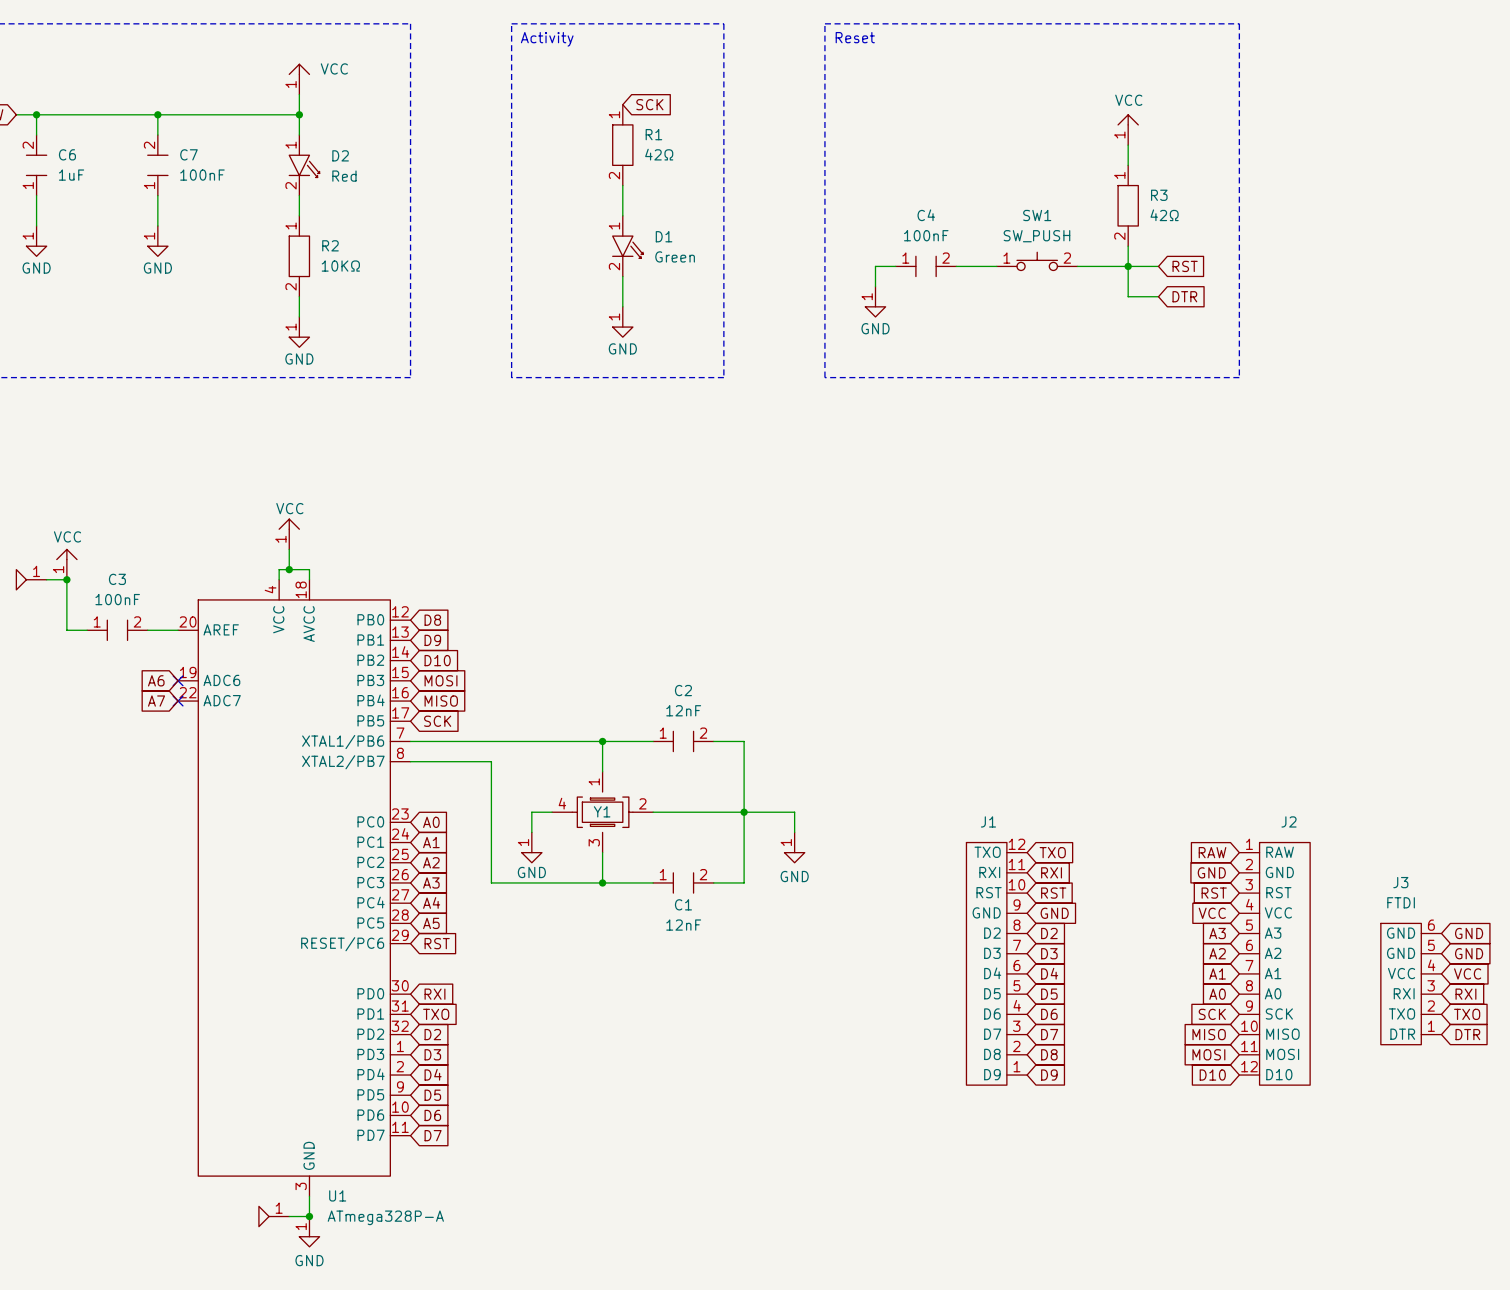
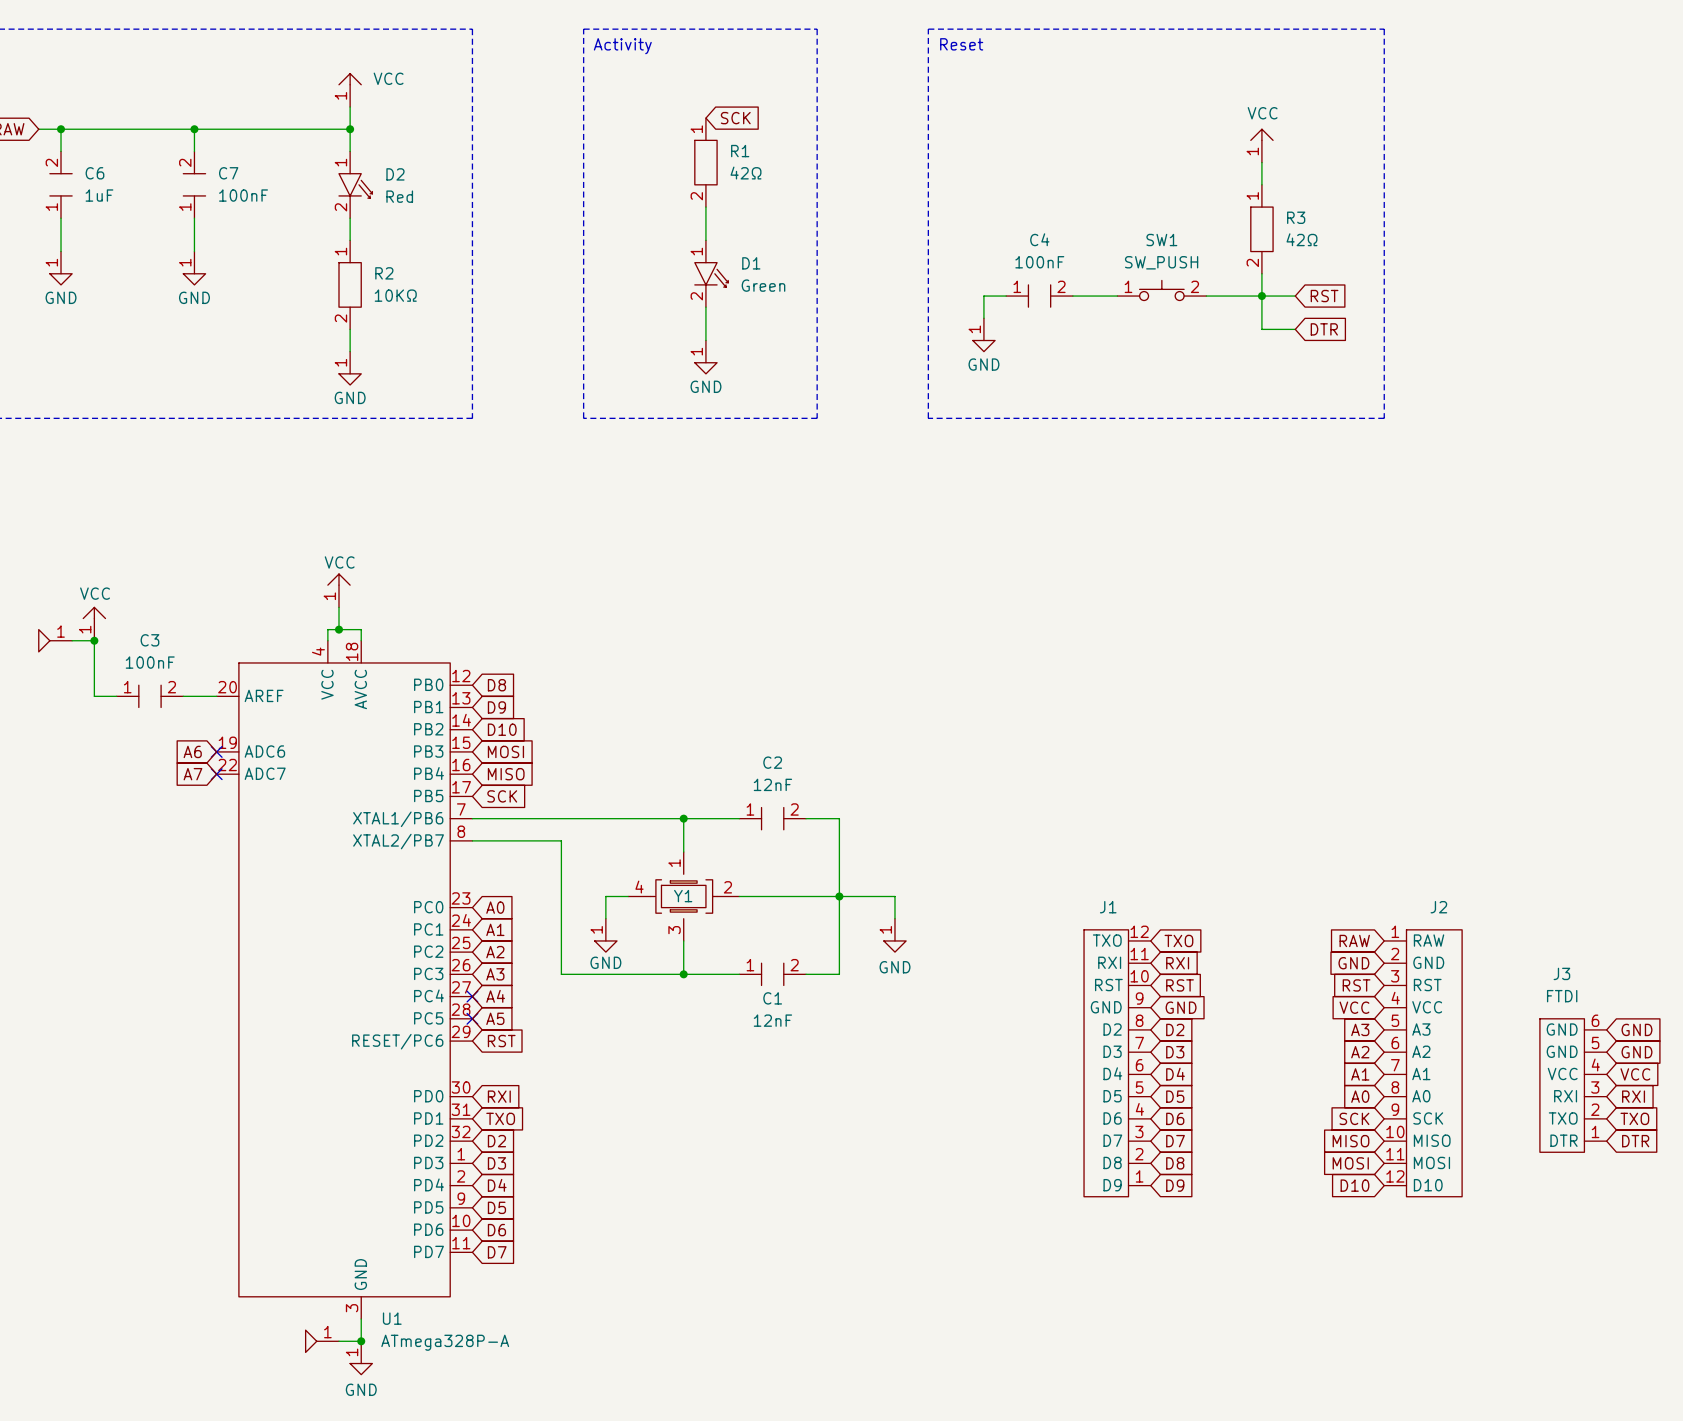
no-connect mark: none -> (472, 996)
no-connect mark: none -> (472, 1018)

